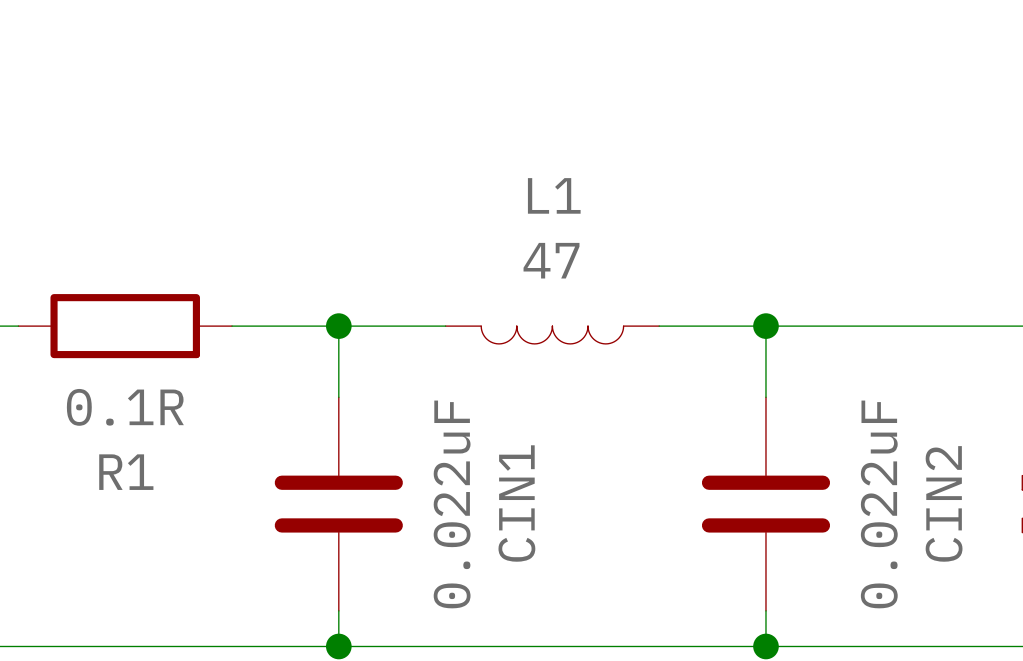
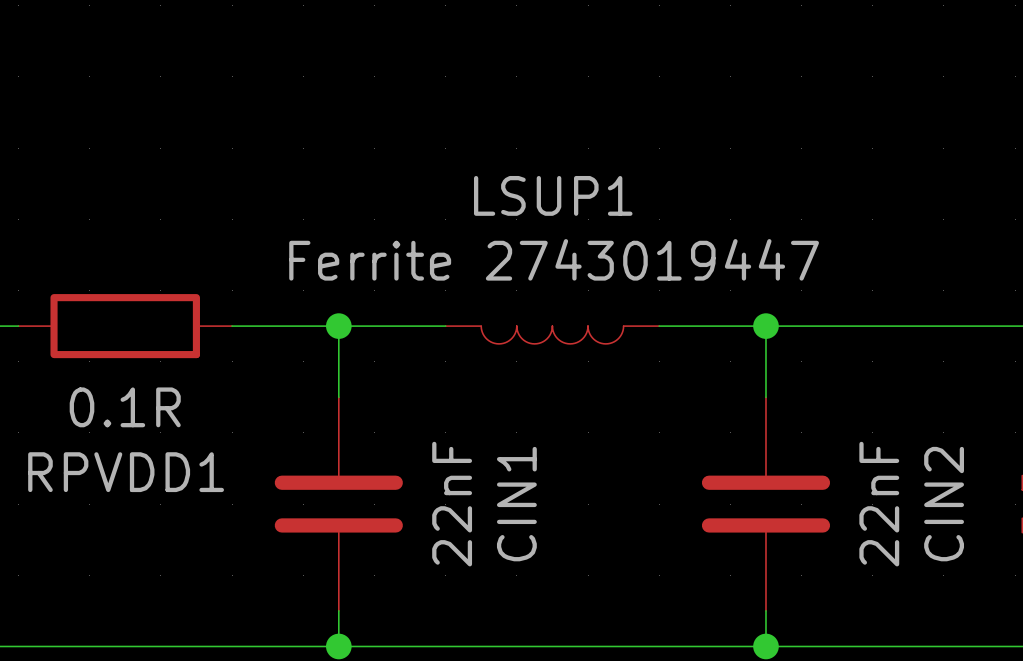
L1 name: L1 (554, 195) -> LSUP1 (553, 195)
L1 value: 47 (551, 260) -> Ferrite 2743019447 (554, 259)
R1 name: R1 (126, 472) -> RPVDD1 (126, 472)
CIN1 value: 0.022uF (452, 504) -> 22nF (452, 504)
CIN2 value: 0.022uF (879, 504) -> 22nF (879, 504)

